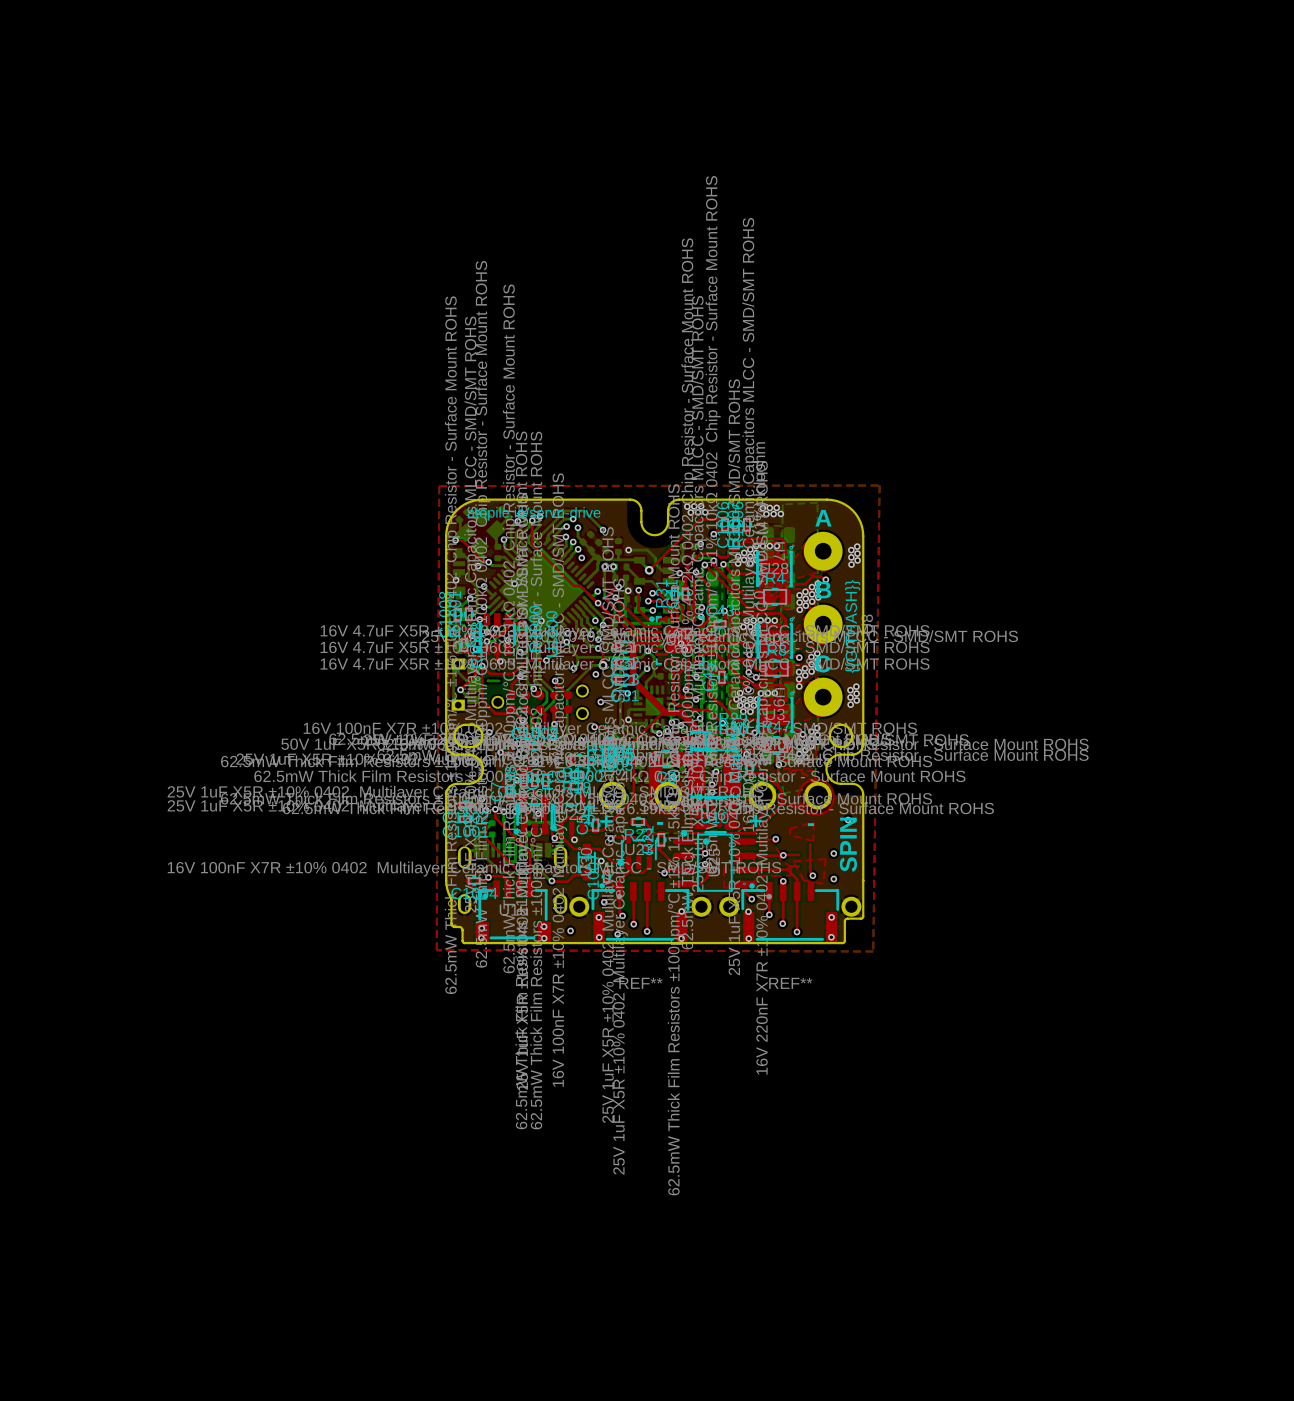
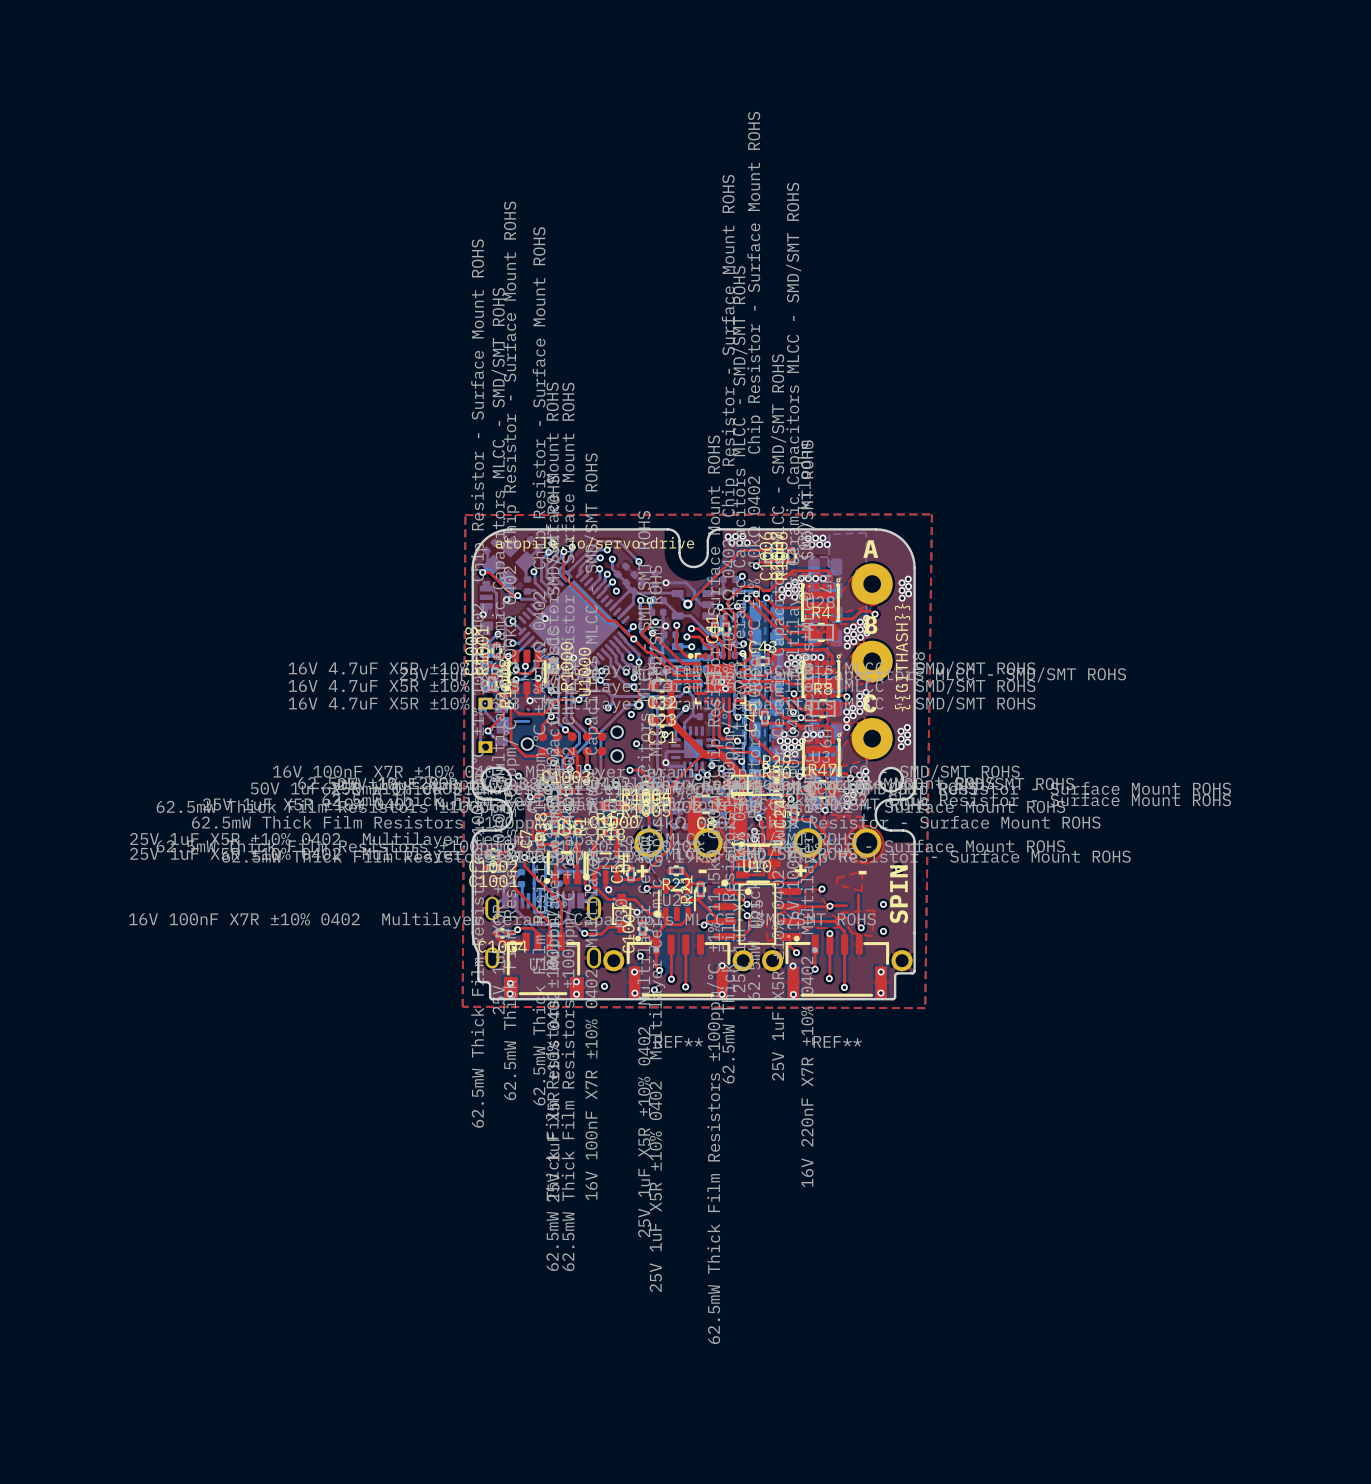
R31 name: R31 (661, 593) -> none

